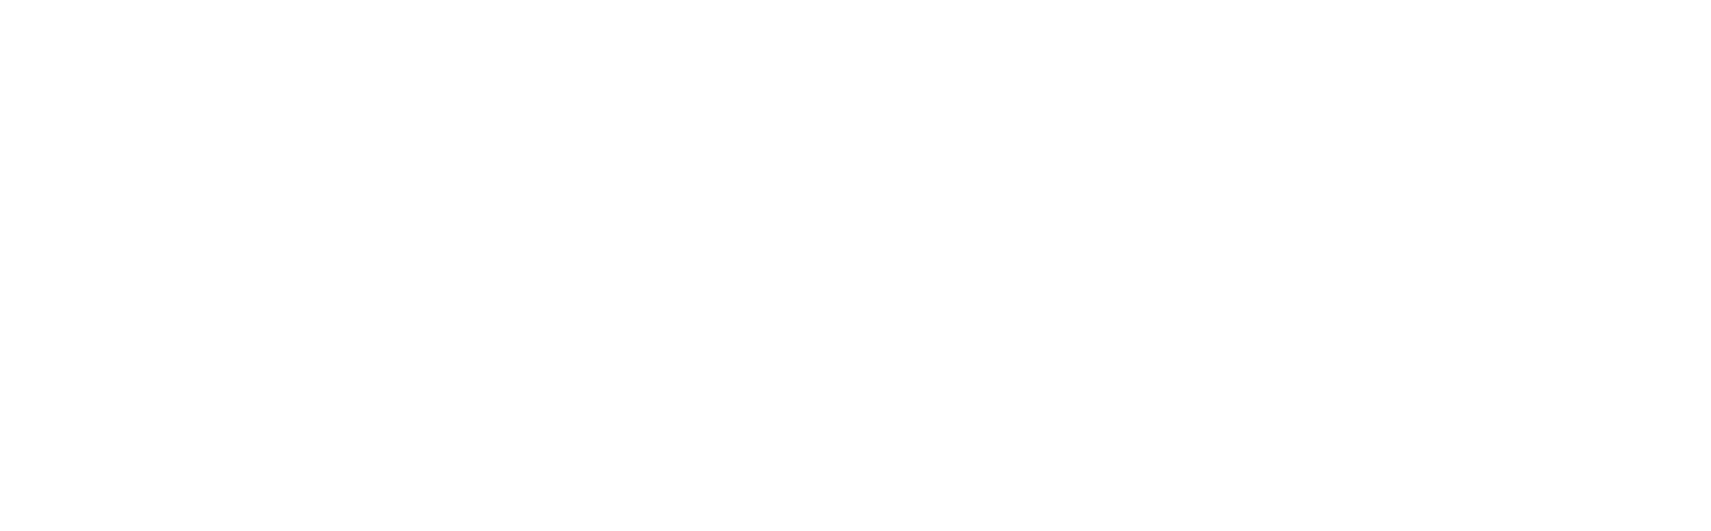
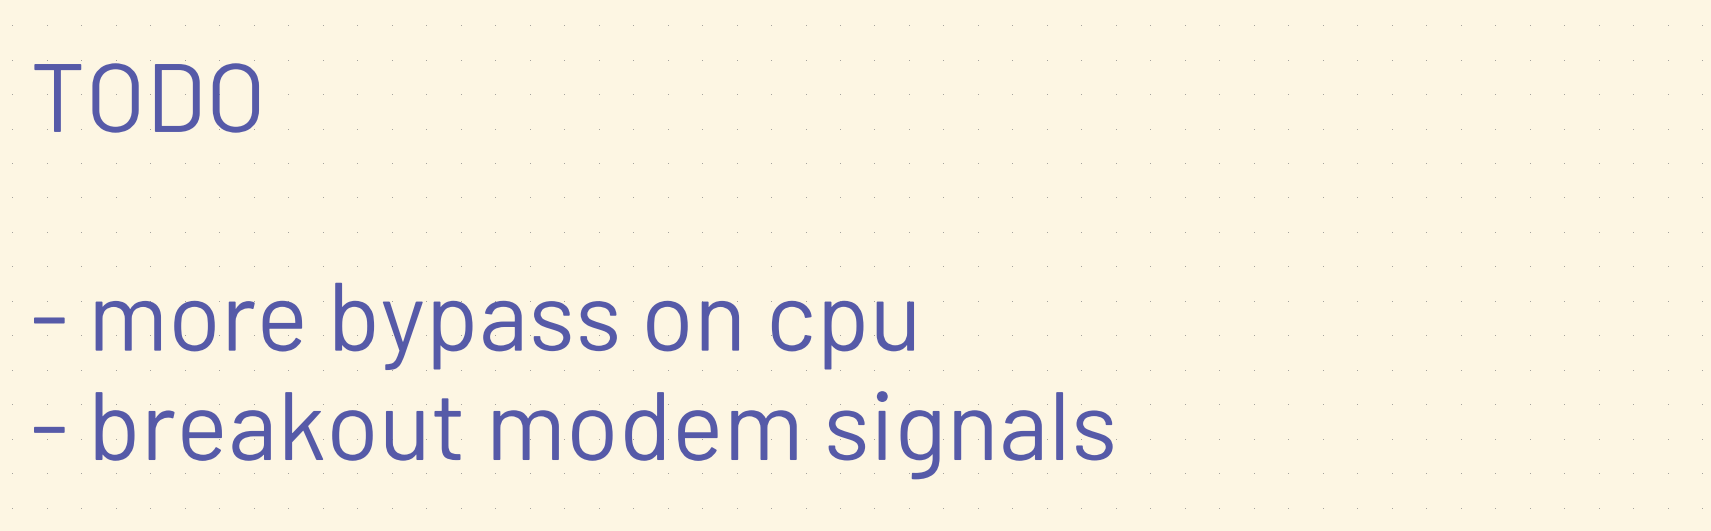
text: none -> TODO (146, 97)
text: none -> - more bypass on cpu (474, 326)
text: none -> - breakout modem signals (573, 435)

